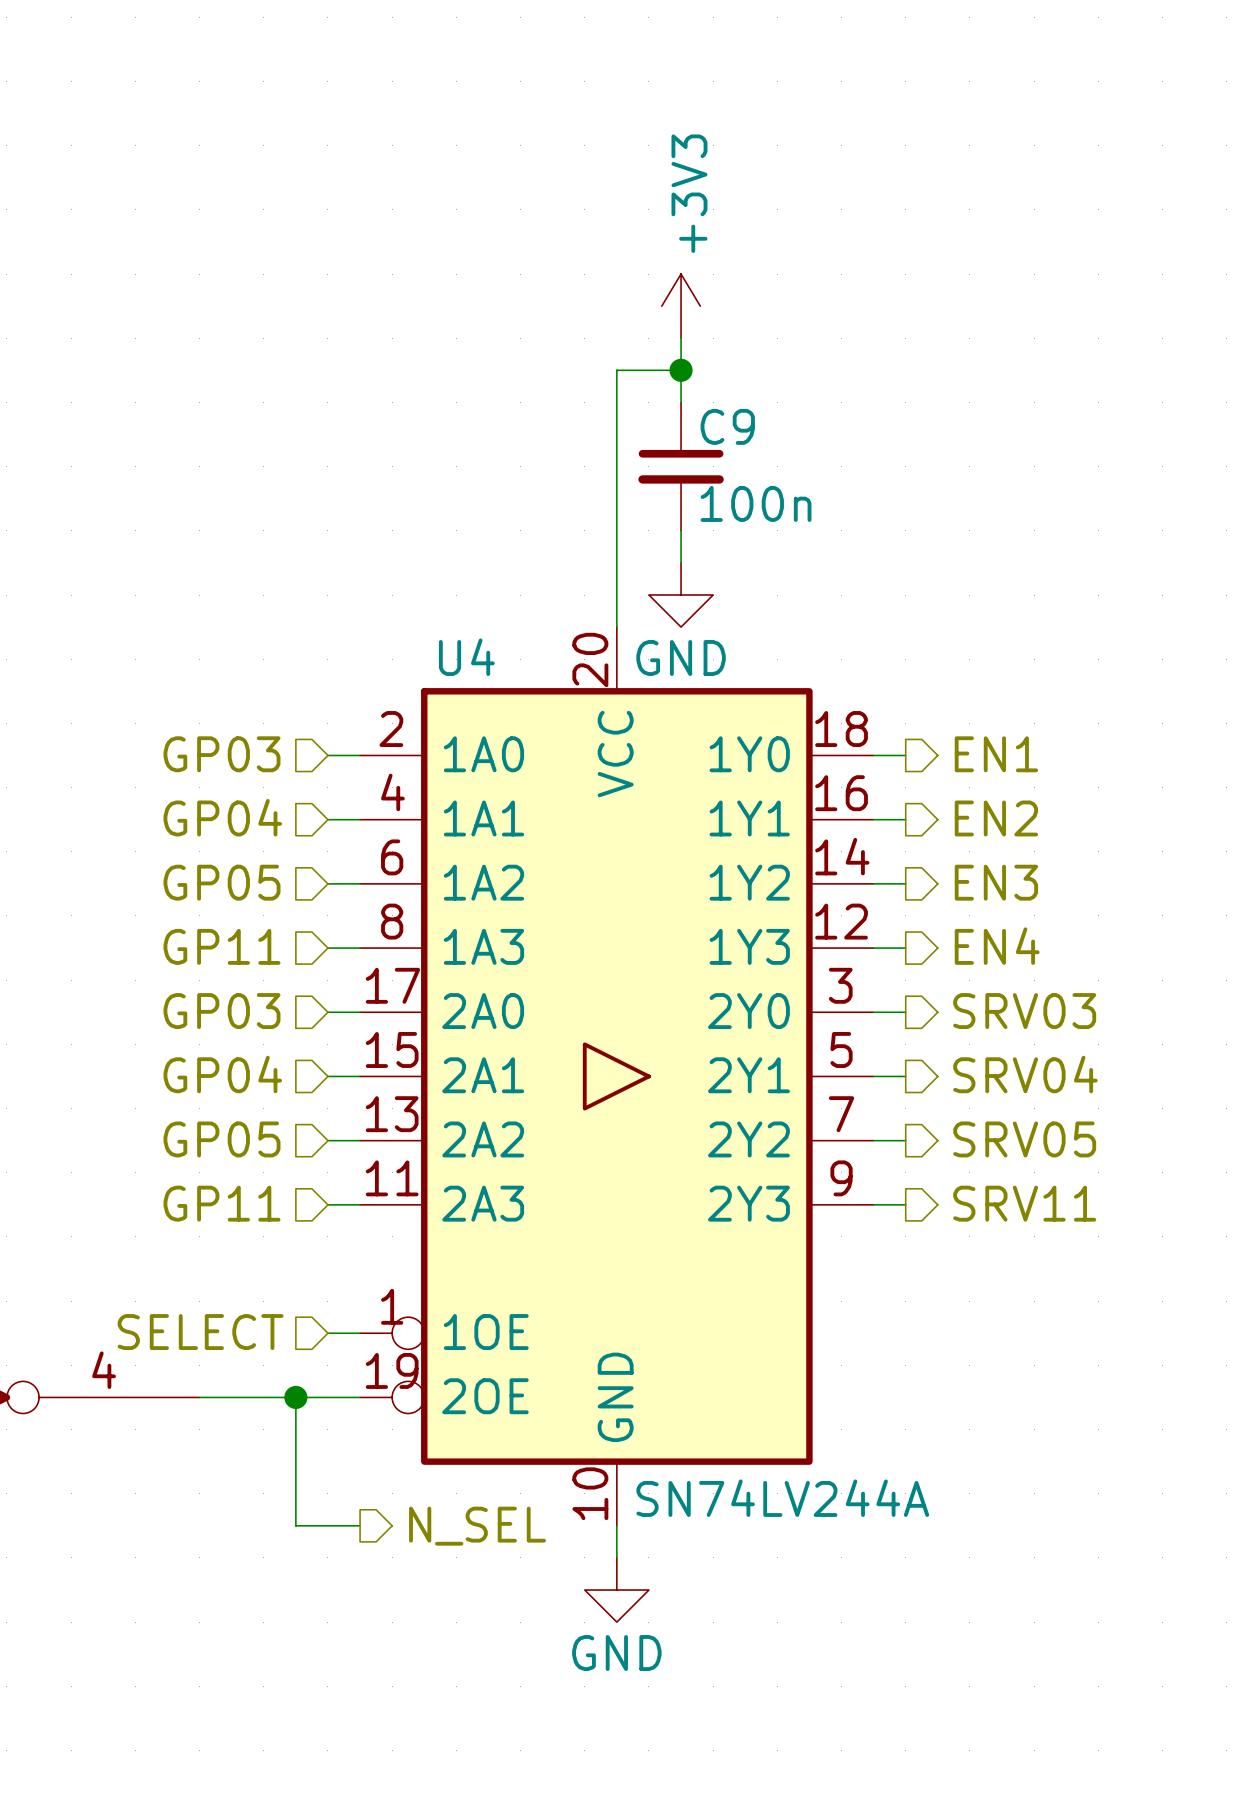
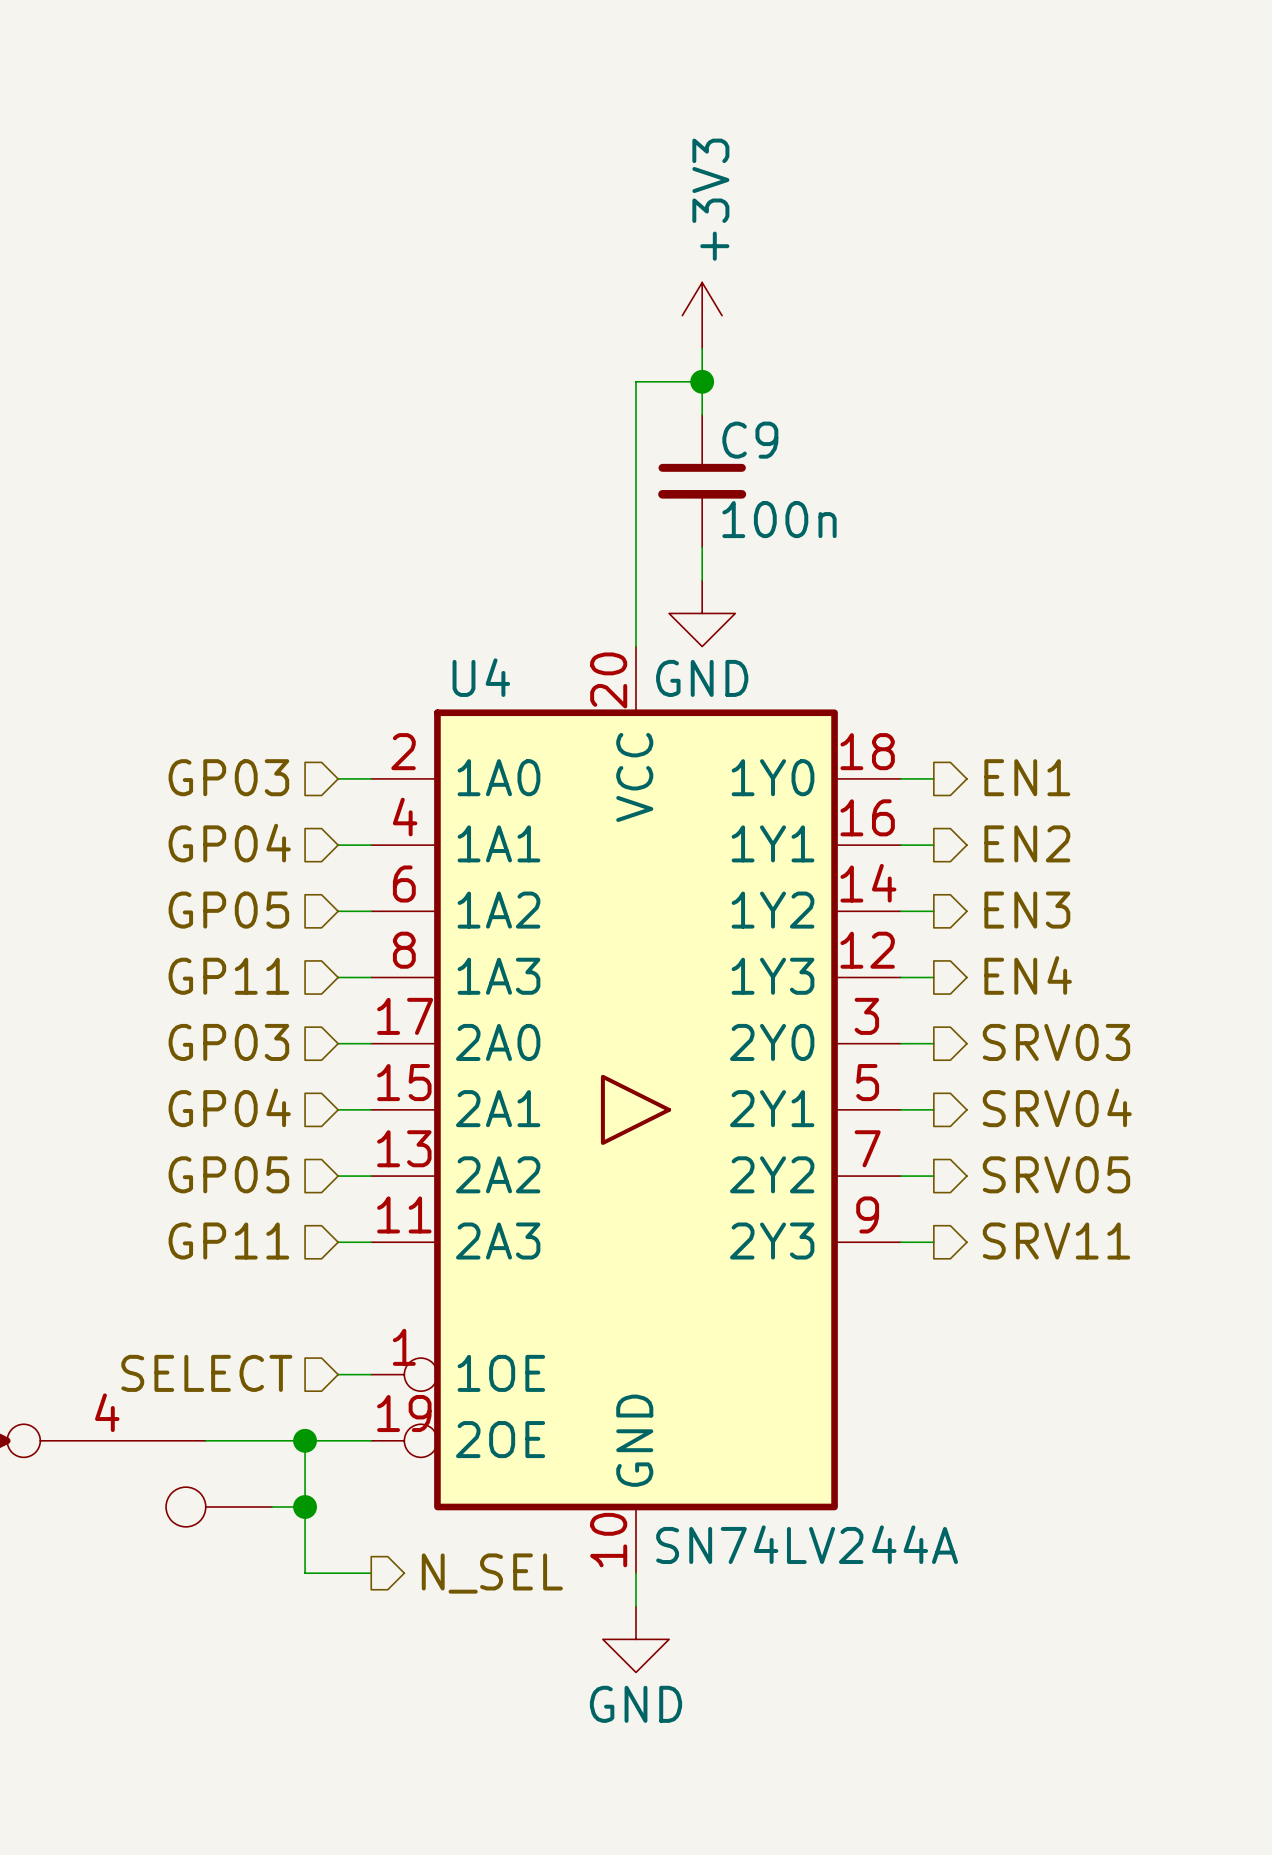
part: none -> (219, 1507)
wire: none -> (271, 1507) (305, 1507)
junction: none -> (305, 1507)

